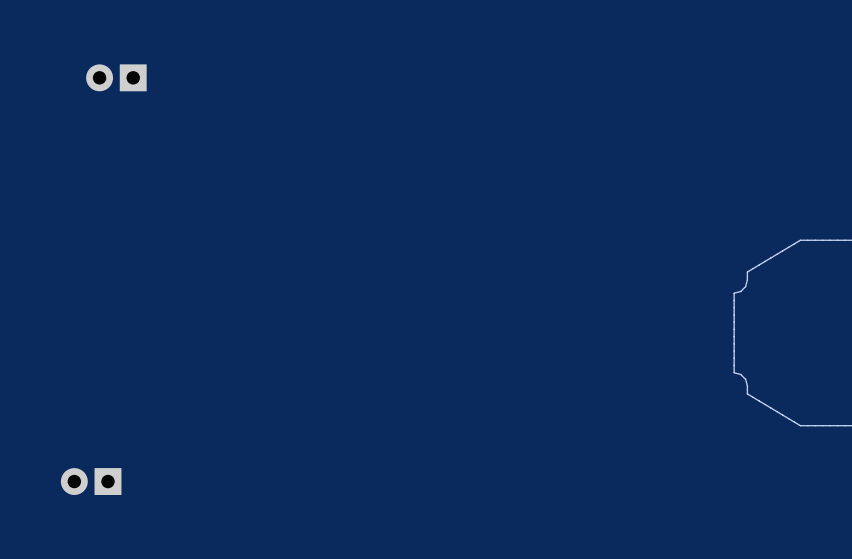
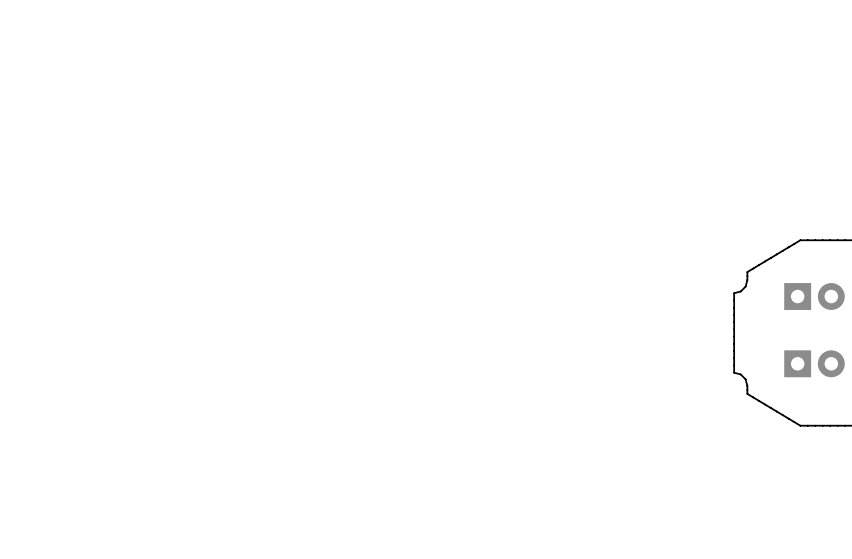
part: (116, 77) -> none
part: none -> (814, 296)
part: none -> (814, 363)
part: (91, 481) -> none

